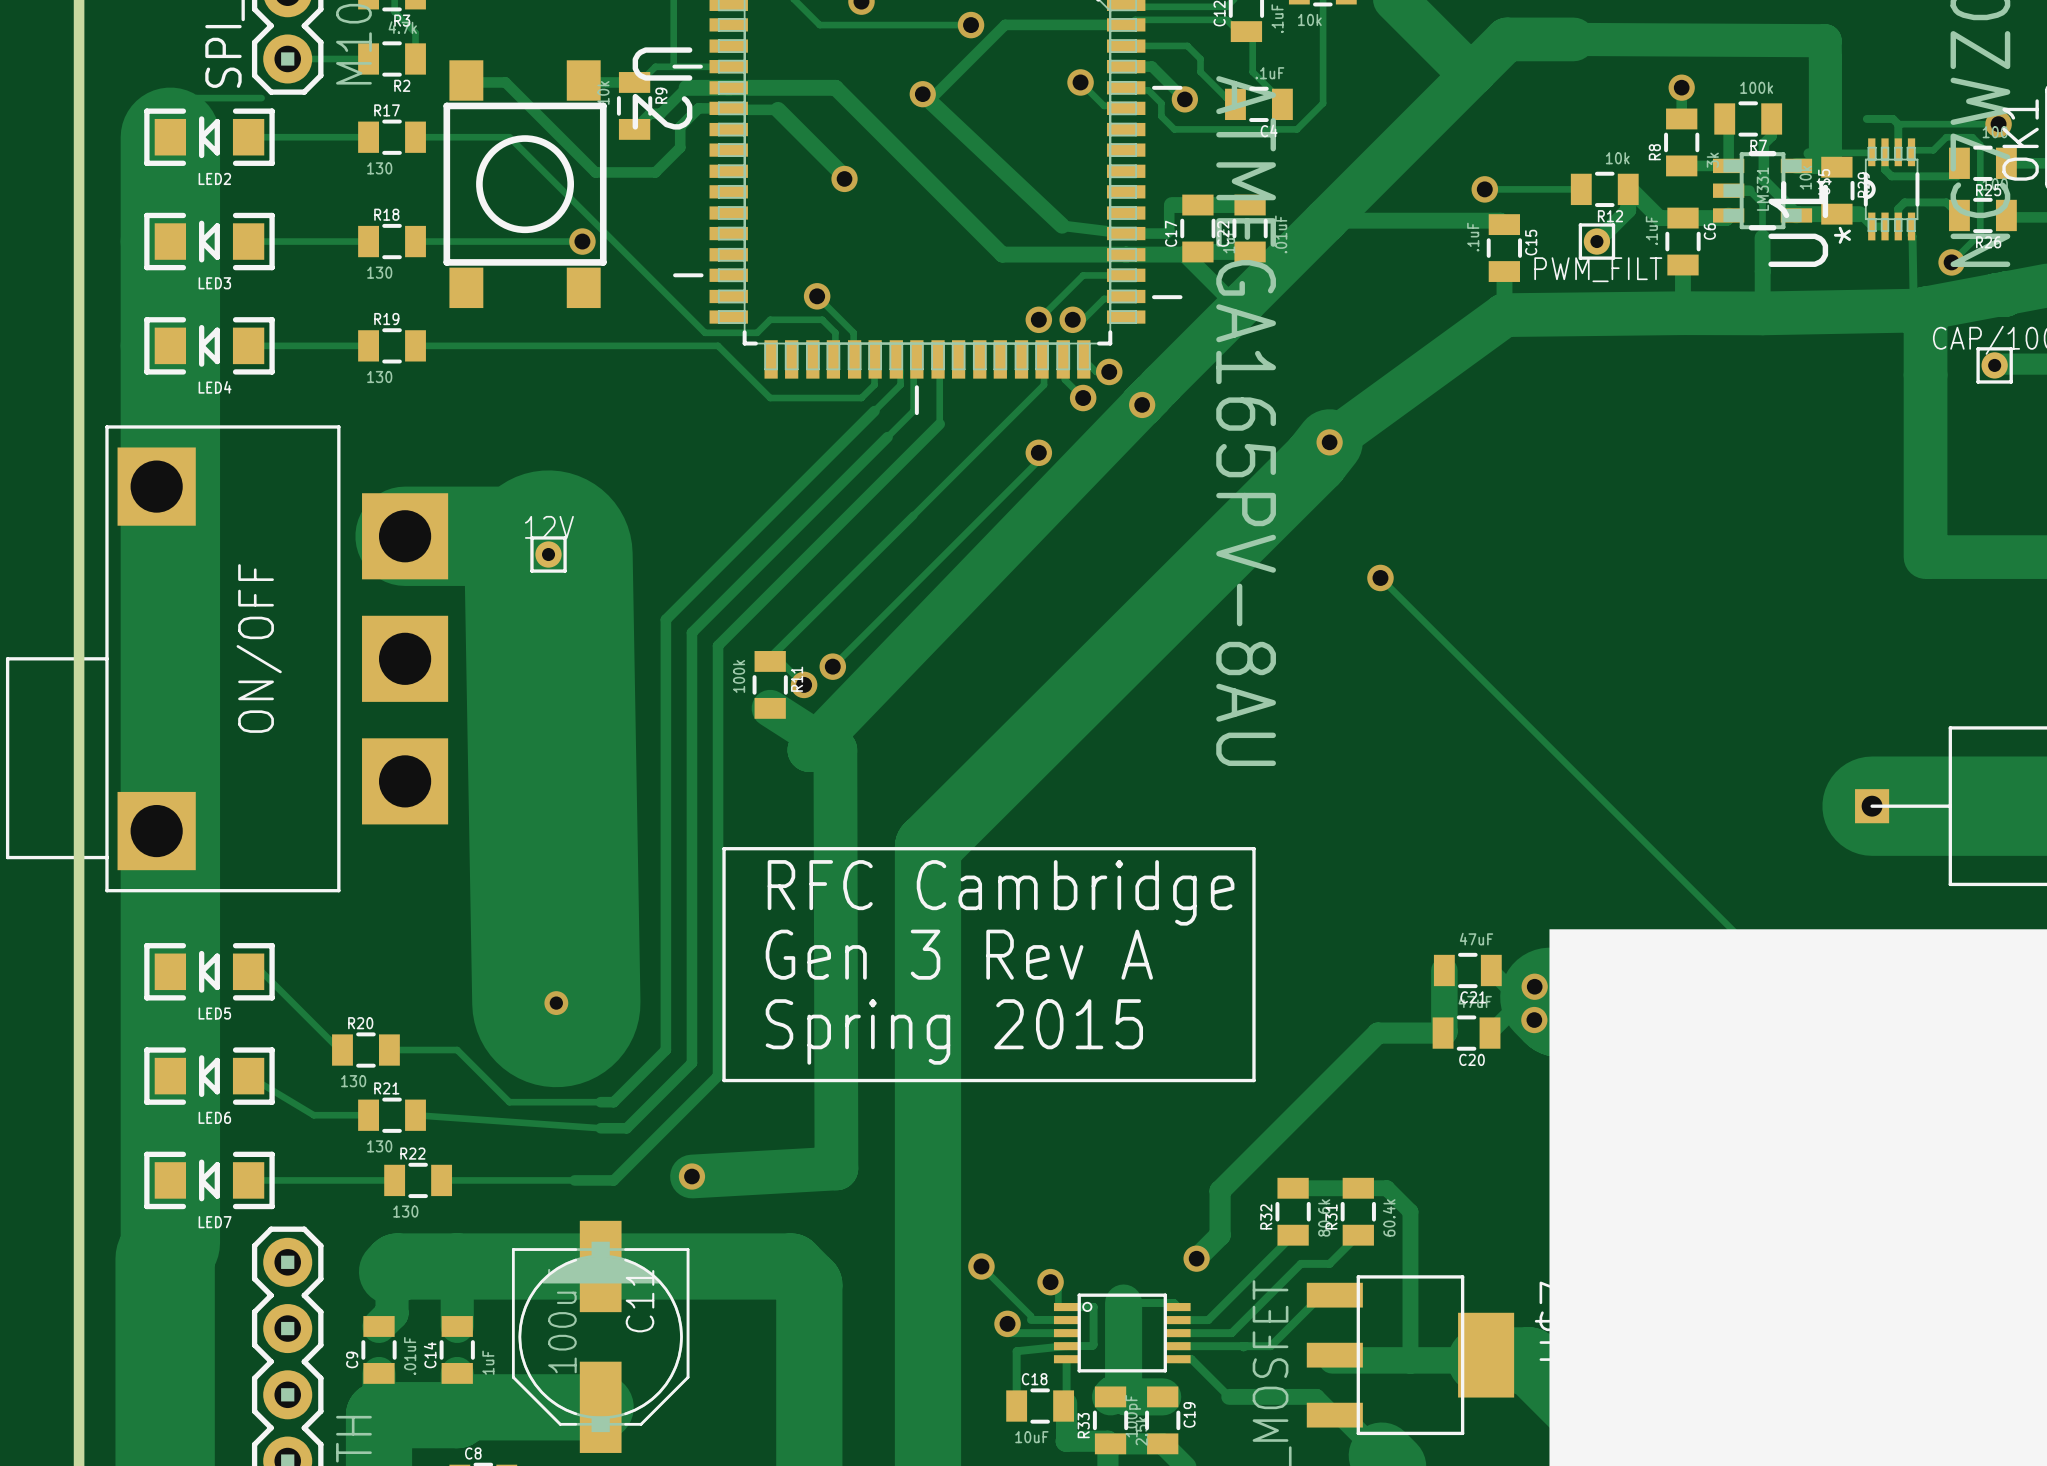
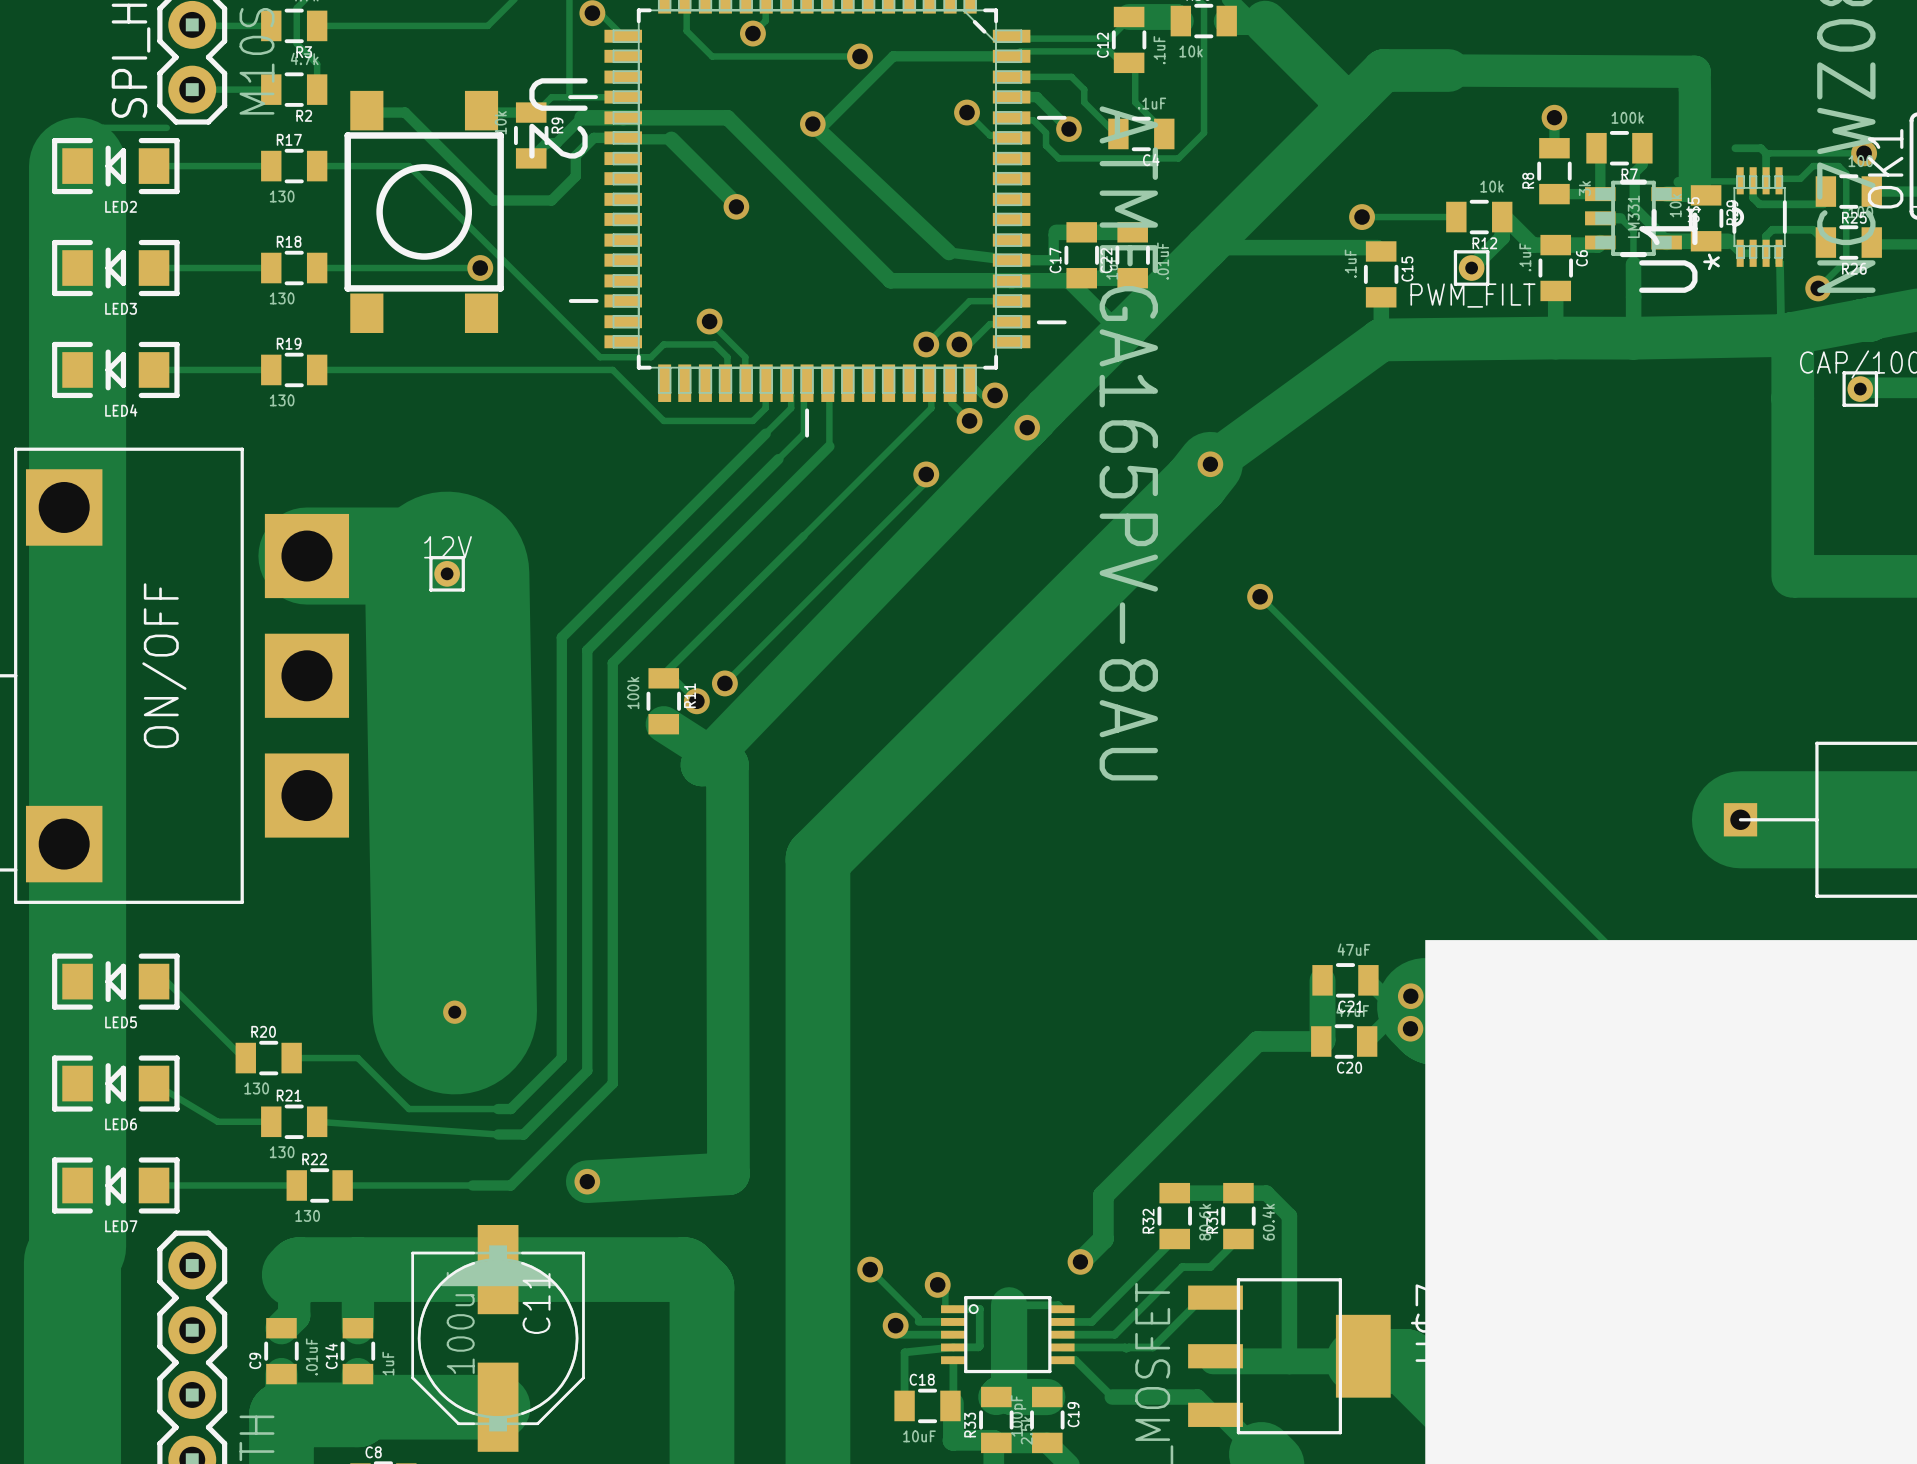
drawing: [722, 847, 1256, 1083] -> none

